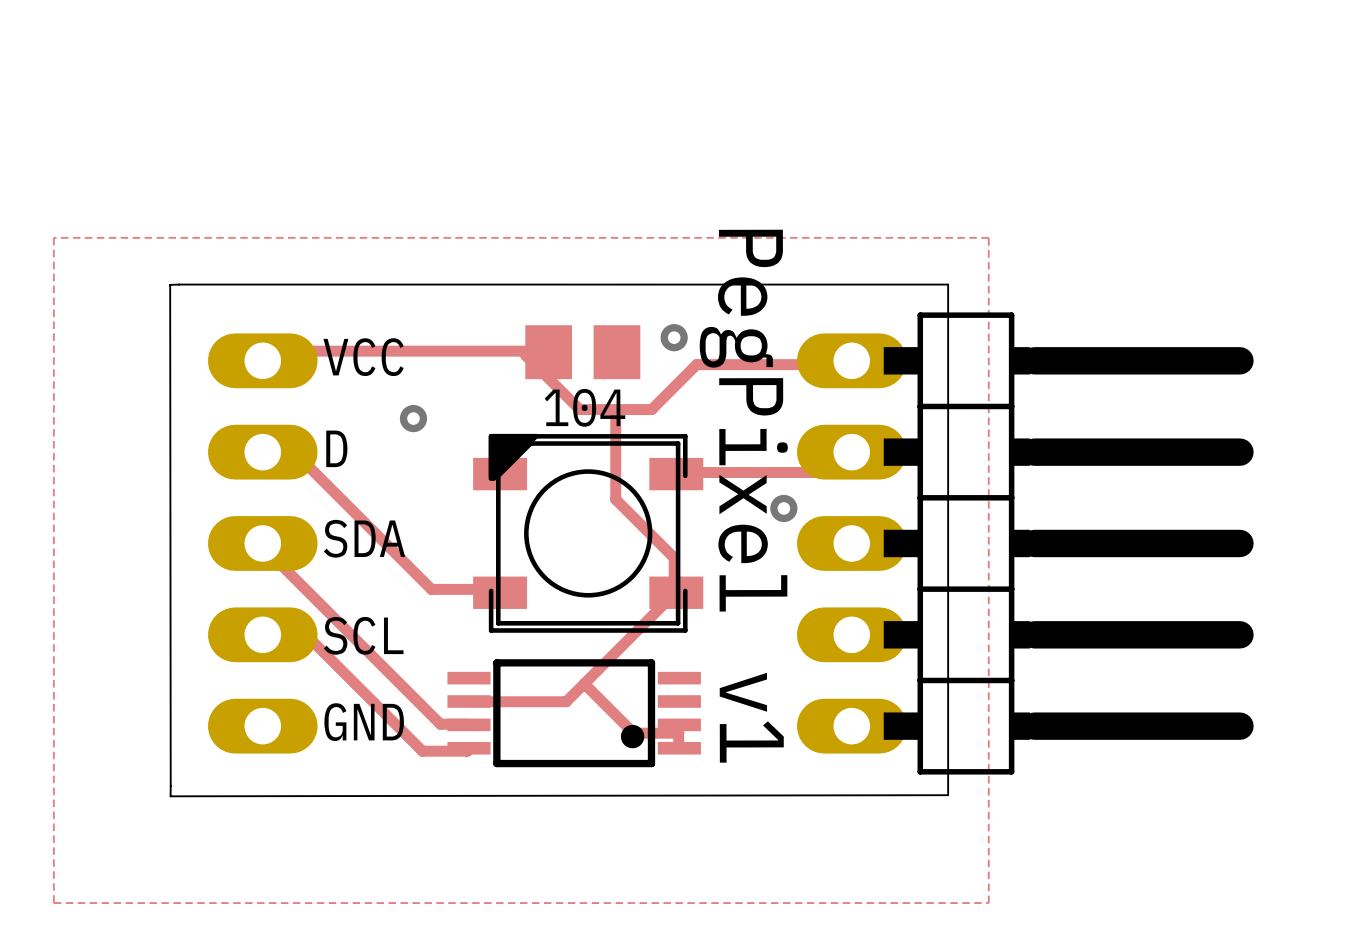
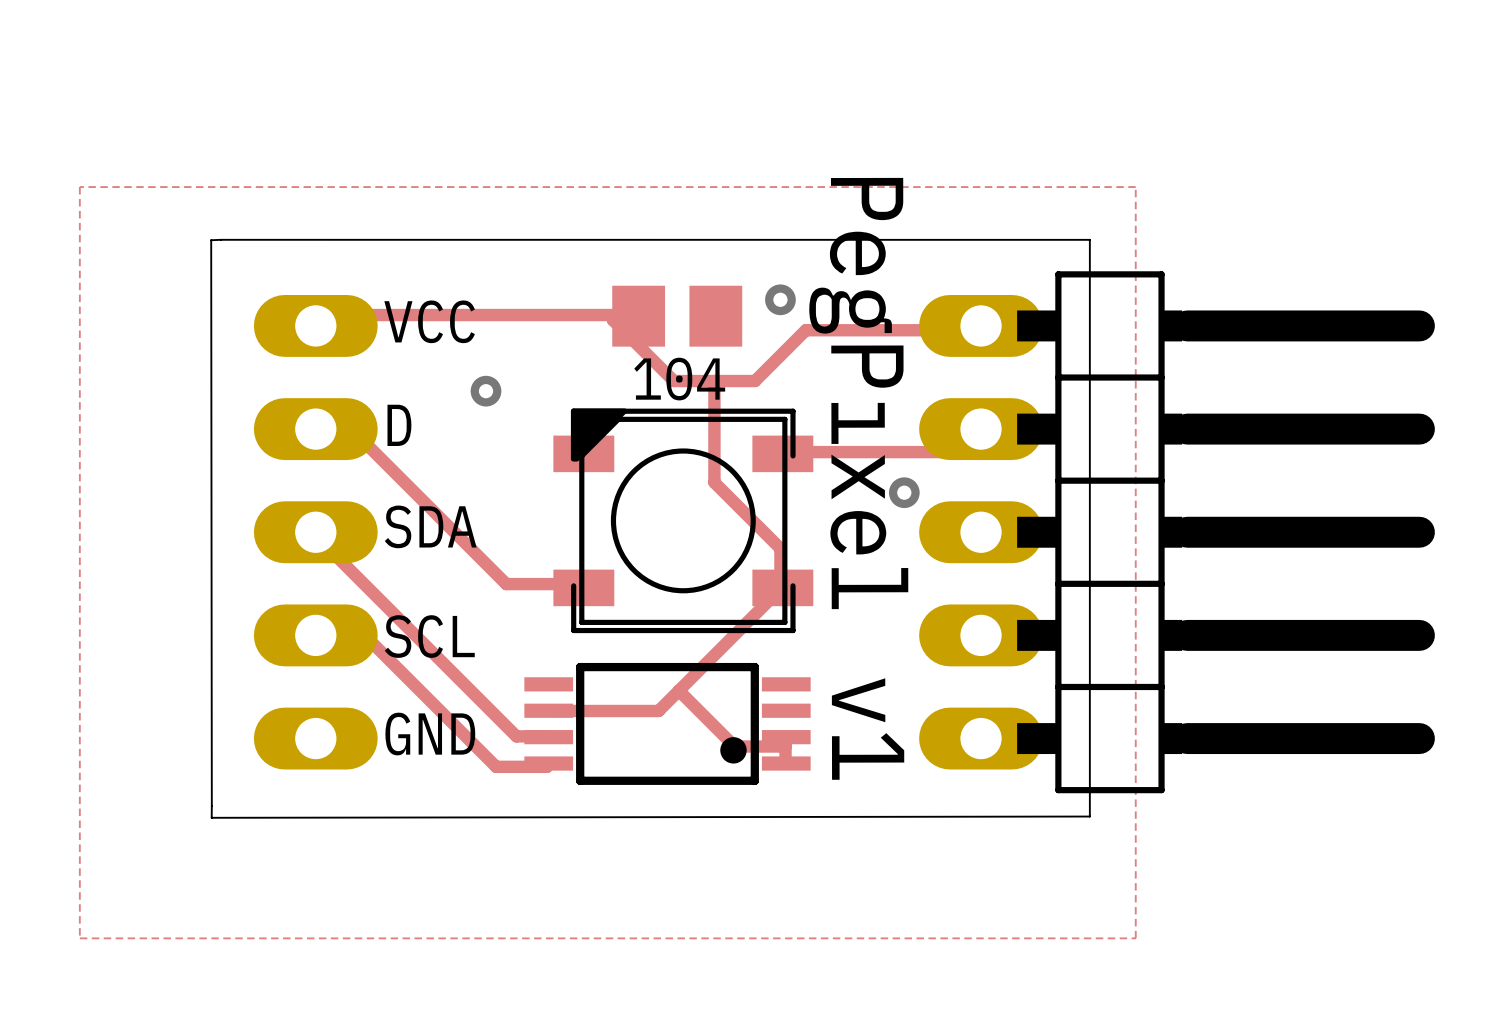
text: PegPixel v1 (743, 496) -> PegPıxel v1 (858, 478)

